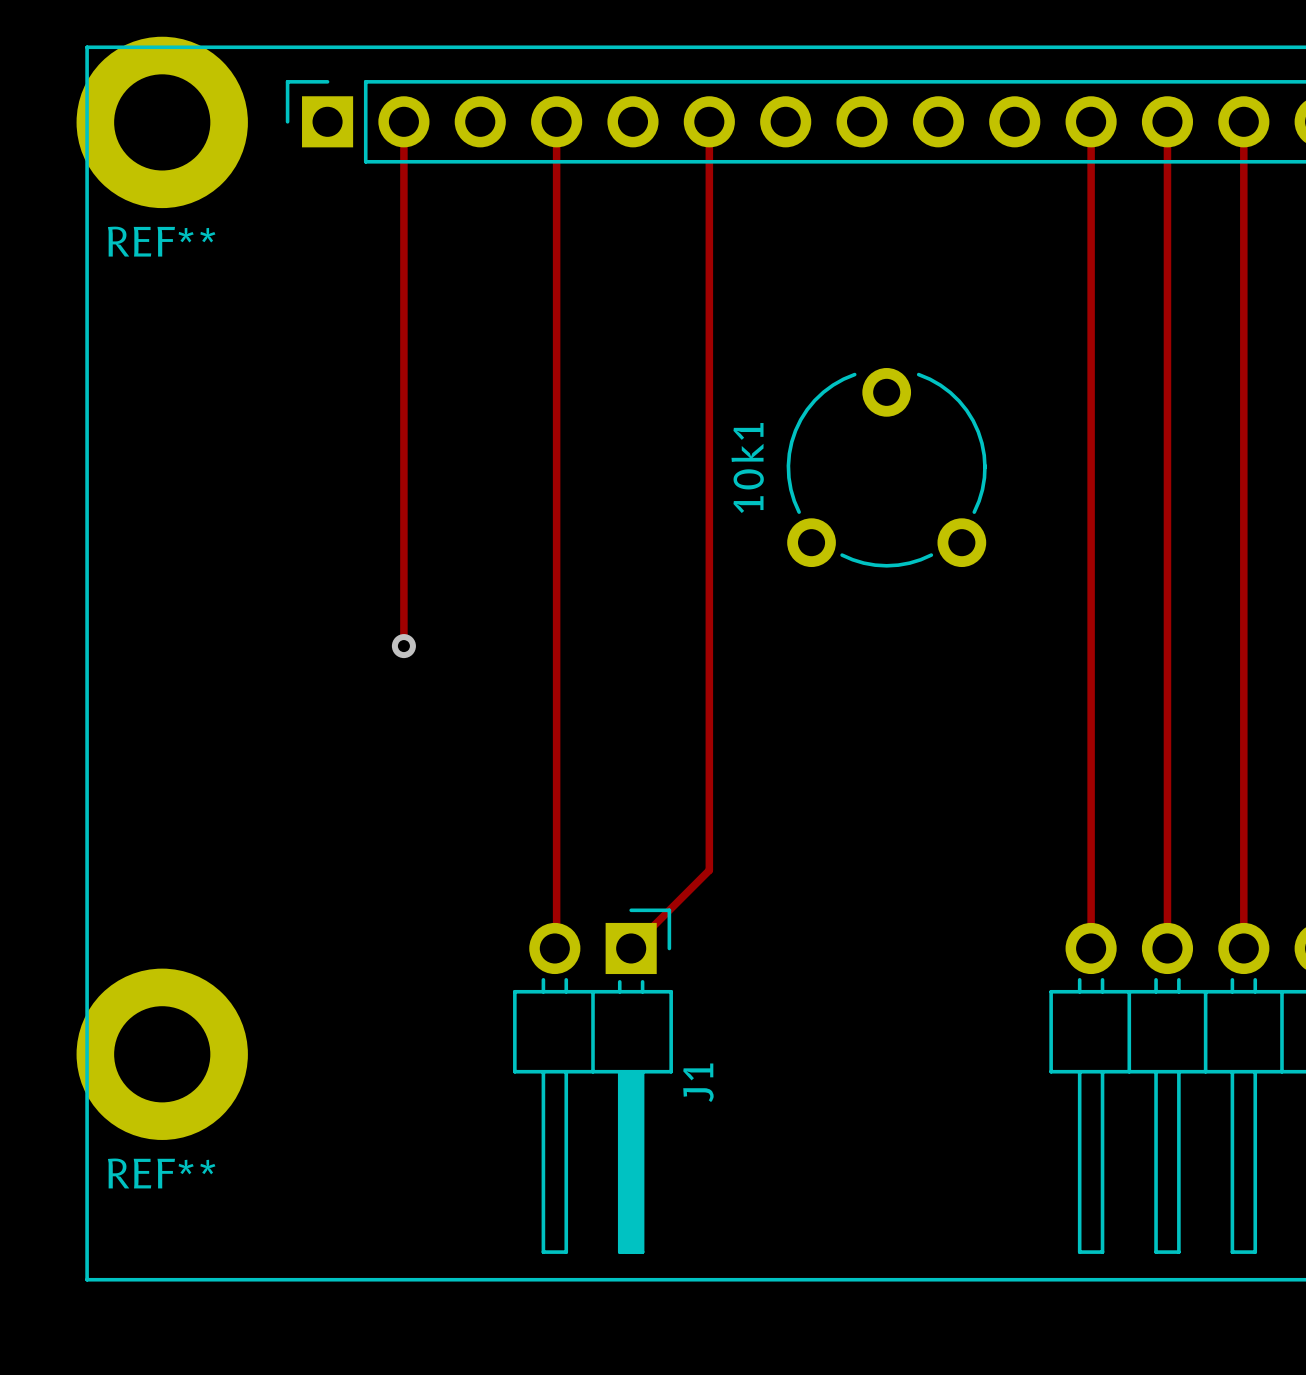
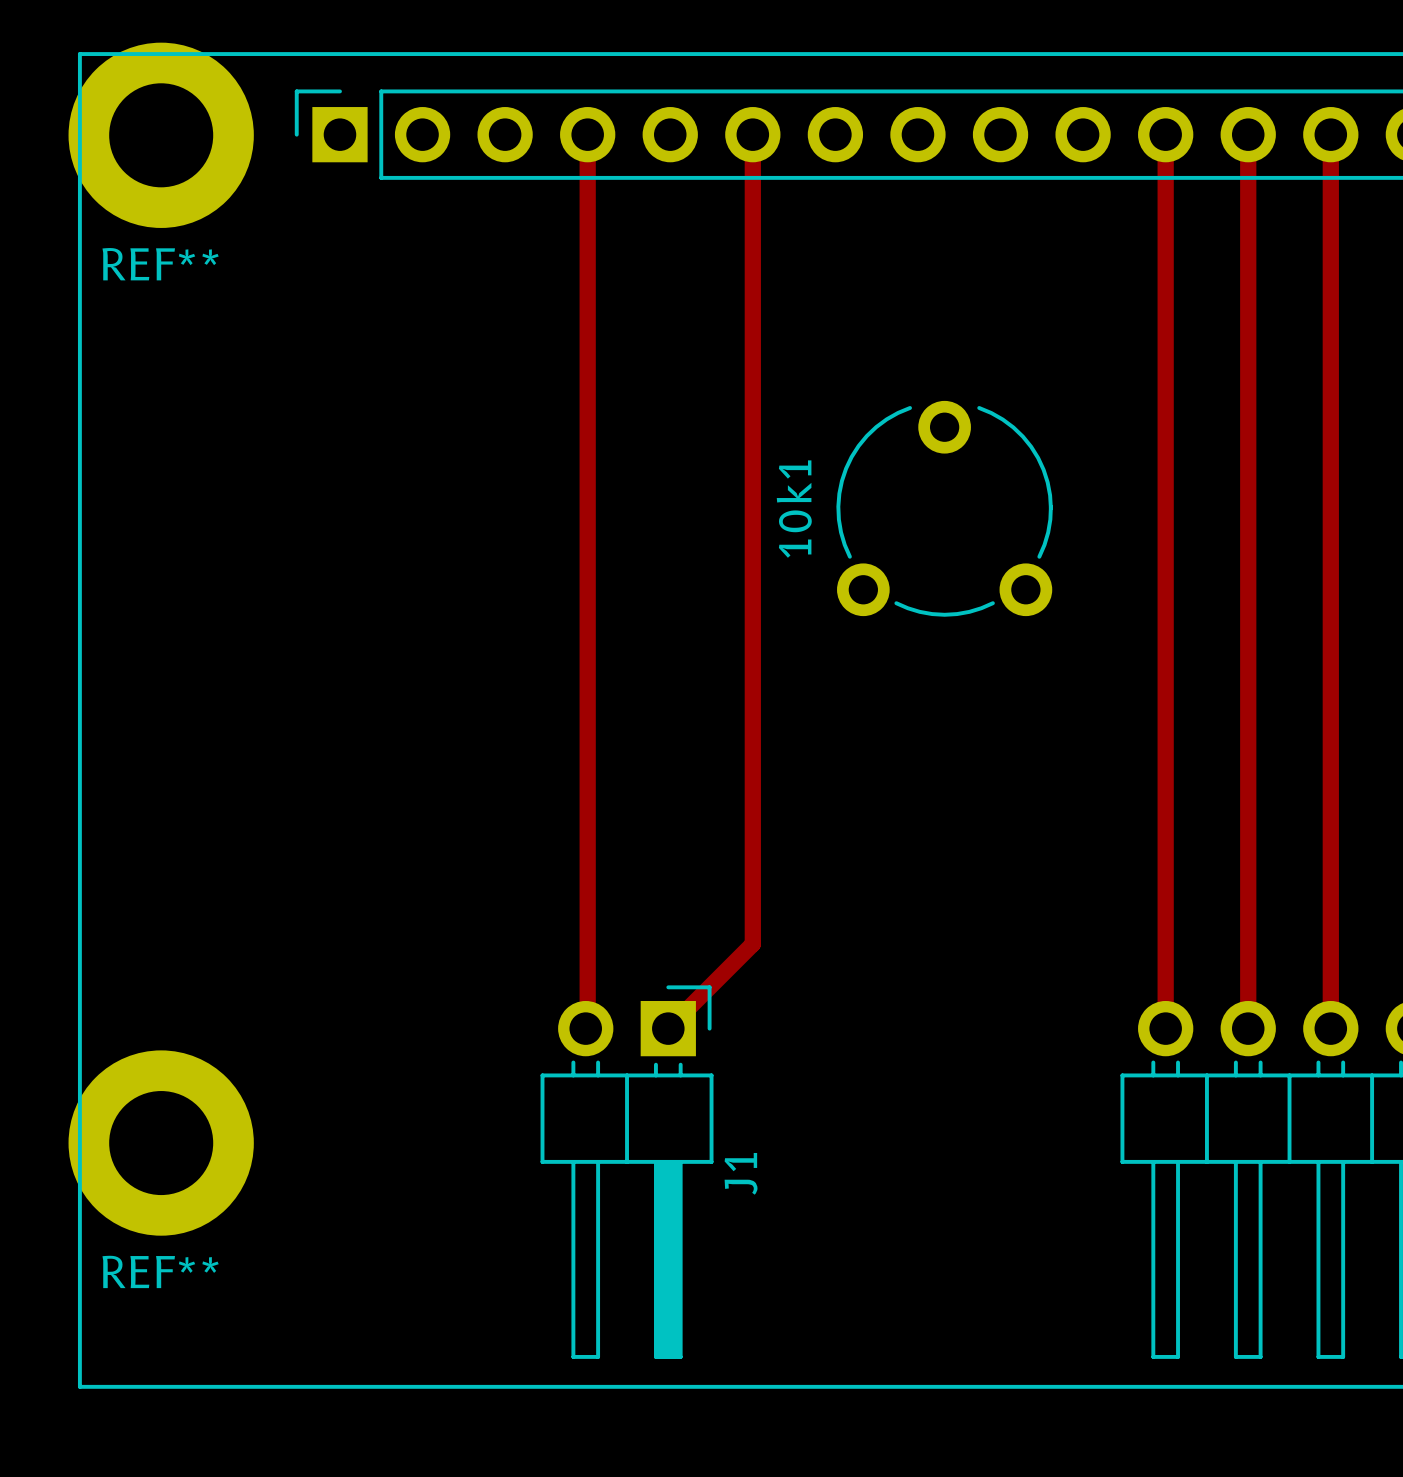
track: (403, 121) (403, 646) -> none
track width: thin (556, 121) (556, 946) (554, 948) -> thick (587, 134) (587, 1026) (585, 1028)
track width: thin (709, 121) (709, 870) (632, 946) -> thick (752, 134) (752, 944) (670, 1026)
track width: thin (1091, 121) (1091, 948) -> thick (1165, 134) (1165, 1028)
track width: thin (1167, 121) (1167, 948) -> thick (1248, 134) (1248, 1028)
track width: thin (1243, 121) (1243, 948) -> thick (1330, 134) (1330, 1028)
via: (403, 646) -> none

